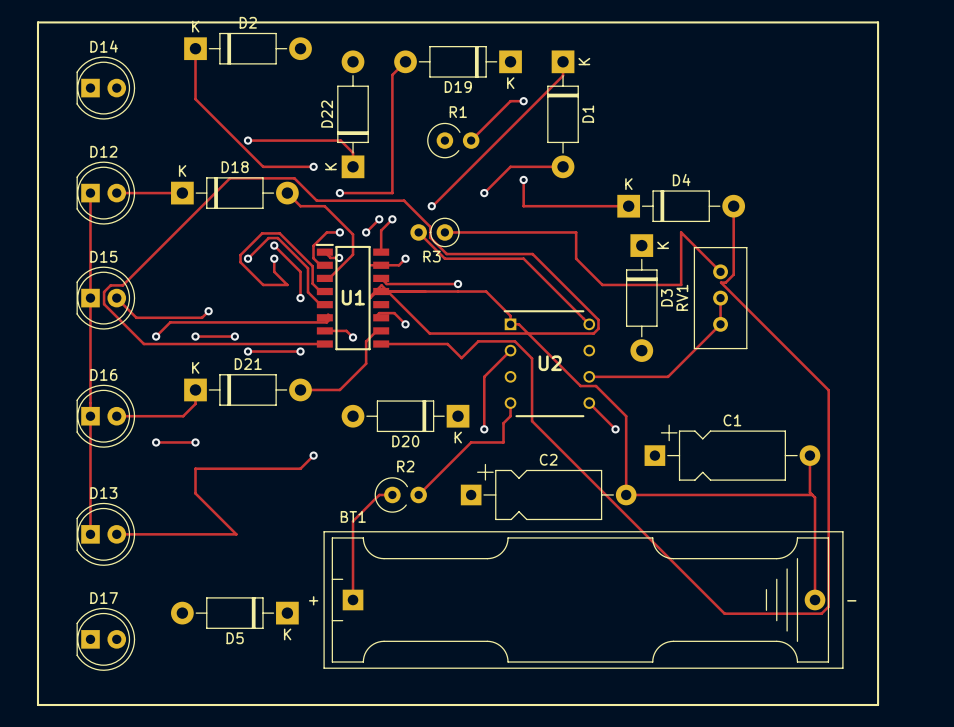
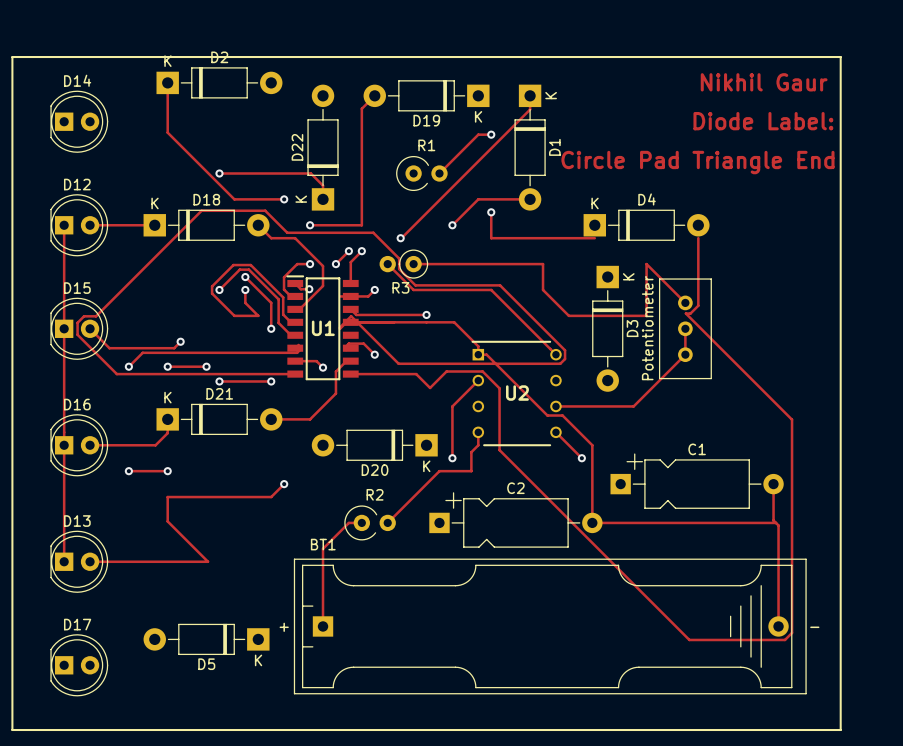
text: none -> Nikhil Gaur (764, 82)
text: none -> Diode Label: (763, 121)
text: none -> Circle Pad Triangle End (697, 162)
D4 position: (681, 206) -> (646, 225)
RV1 name: RV1 (682, 297) -> Potentiometer (647, 328)

